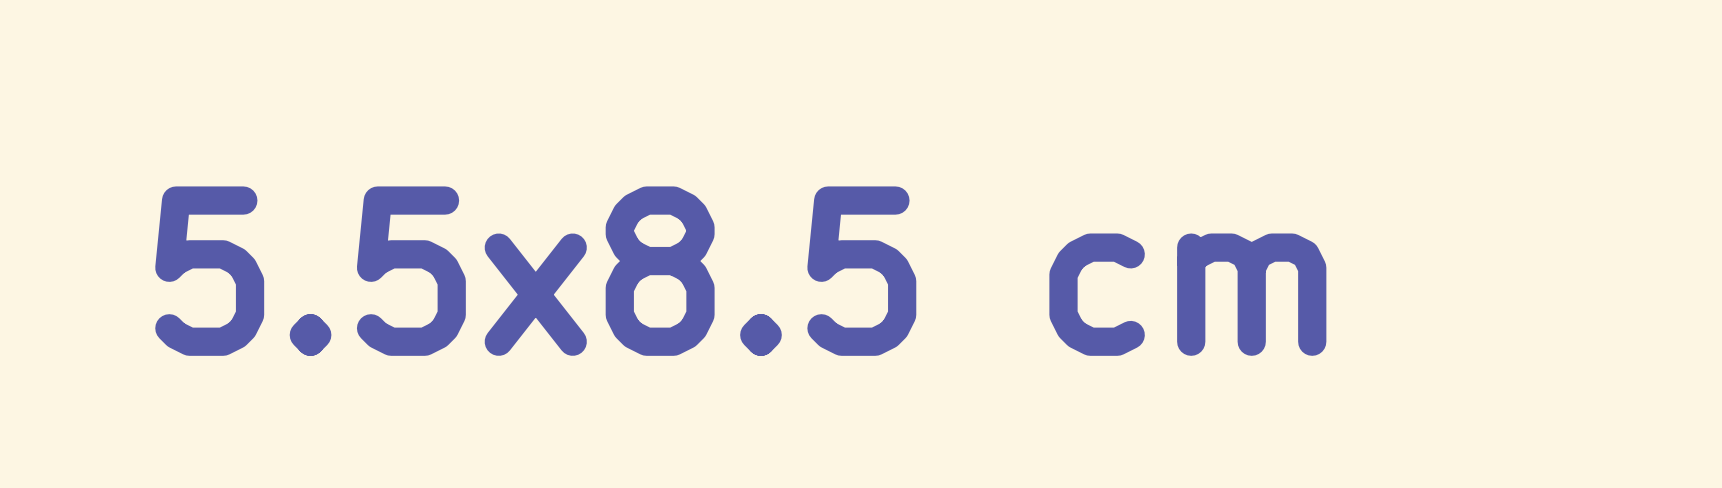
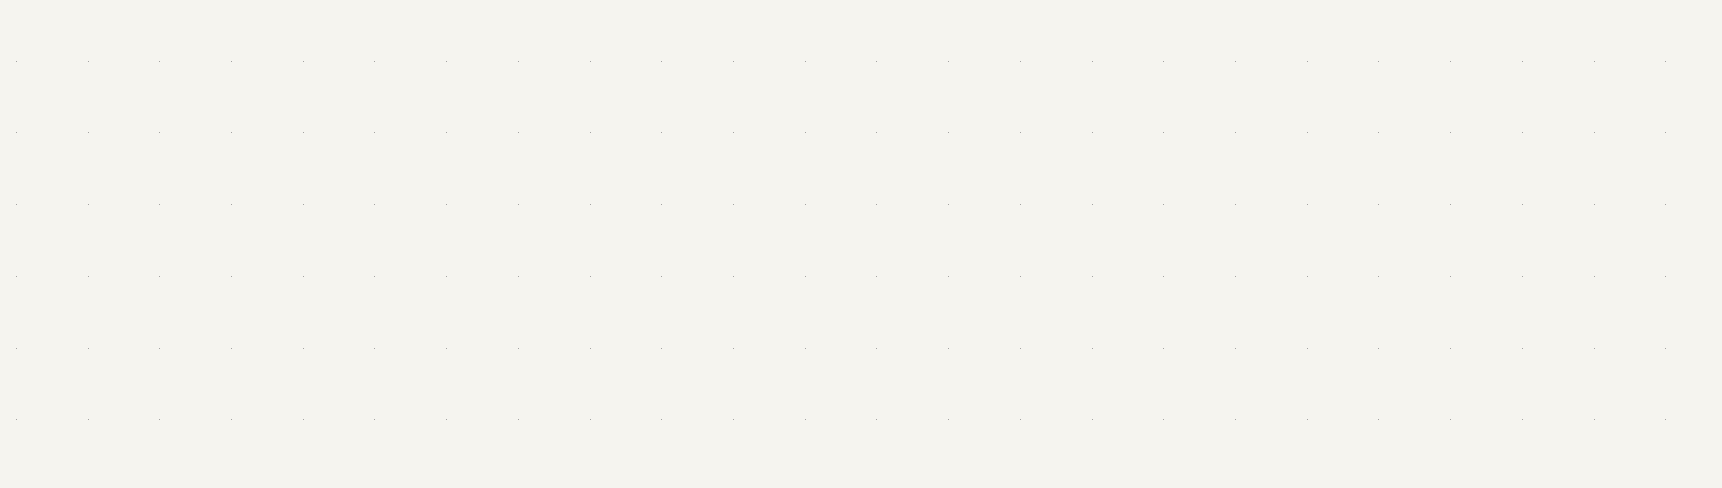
text: 5.5x8.5 cm (740, 271) -> none

